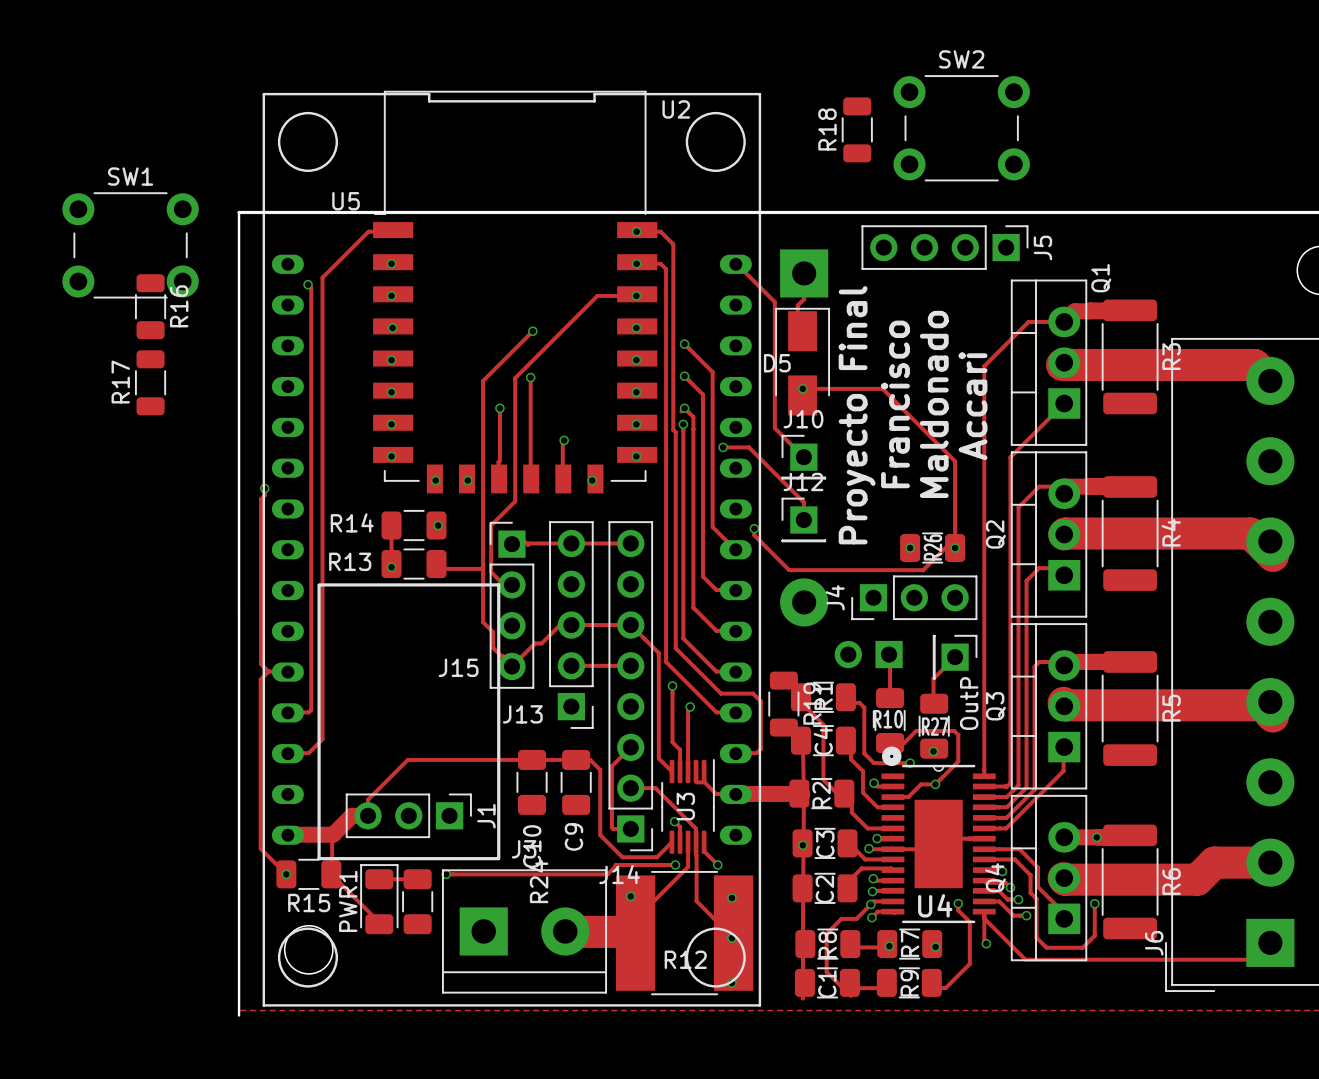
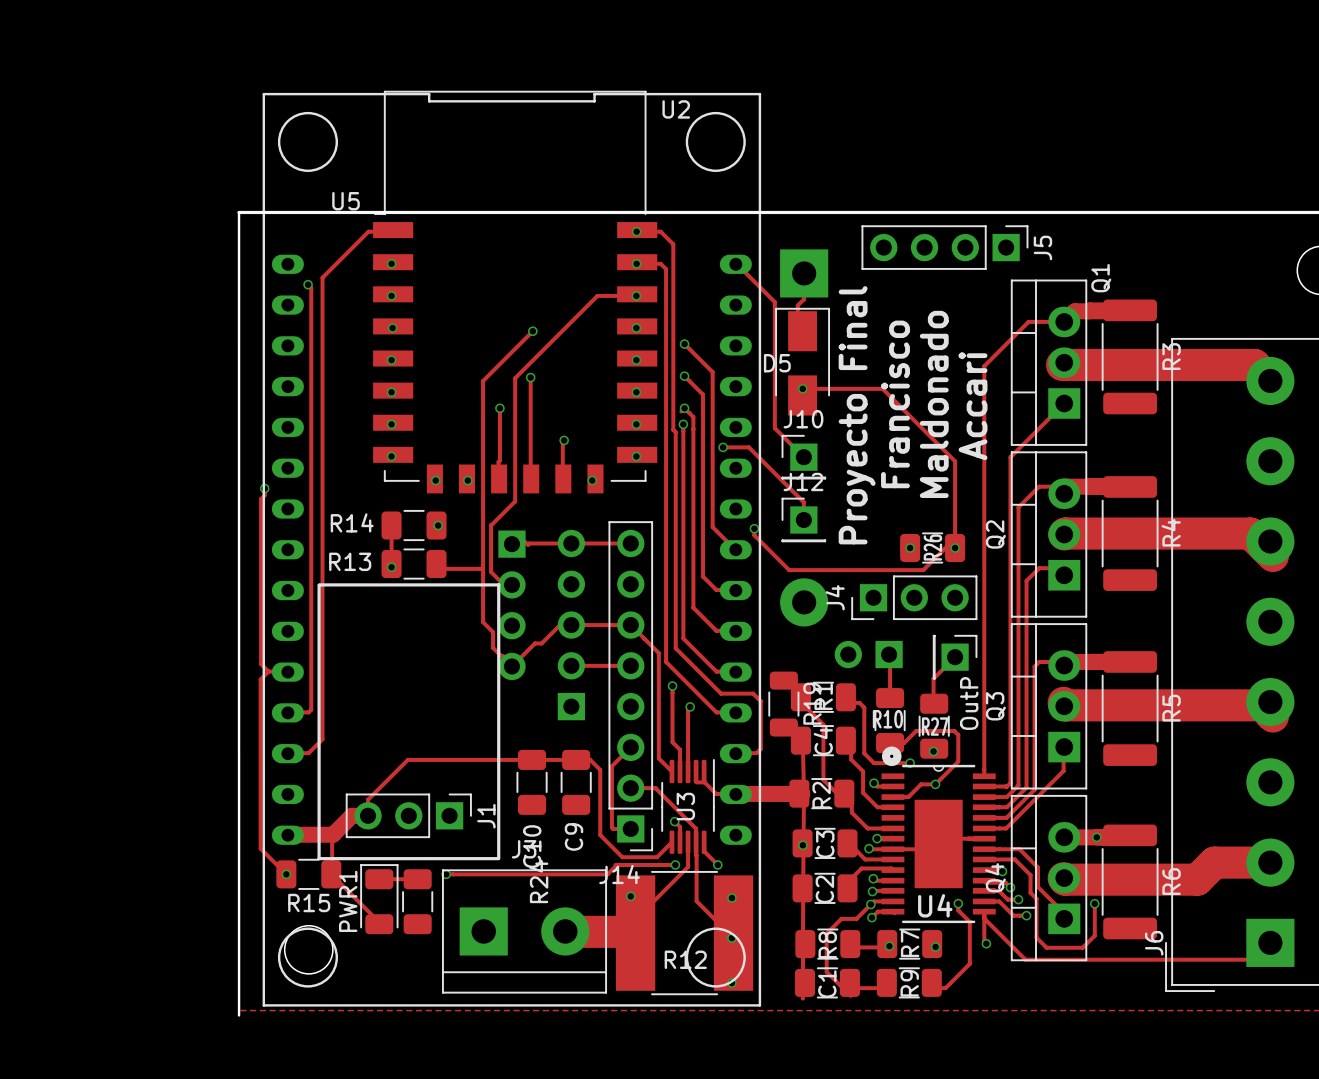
SW2: (961, 128) -> none
R18: (857, 129) -> none
SW1: (130, 245) -> none
R16: (150, 306) -> none
R17: (150, 382) -> none
J15 side: top (511, 605) -> bottom (511, 605)
J13 side: top (571, 625) -> bottom (571, 625)

